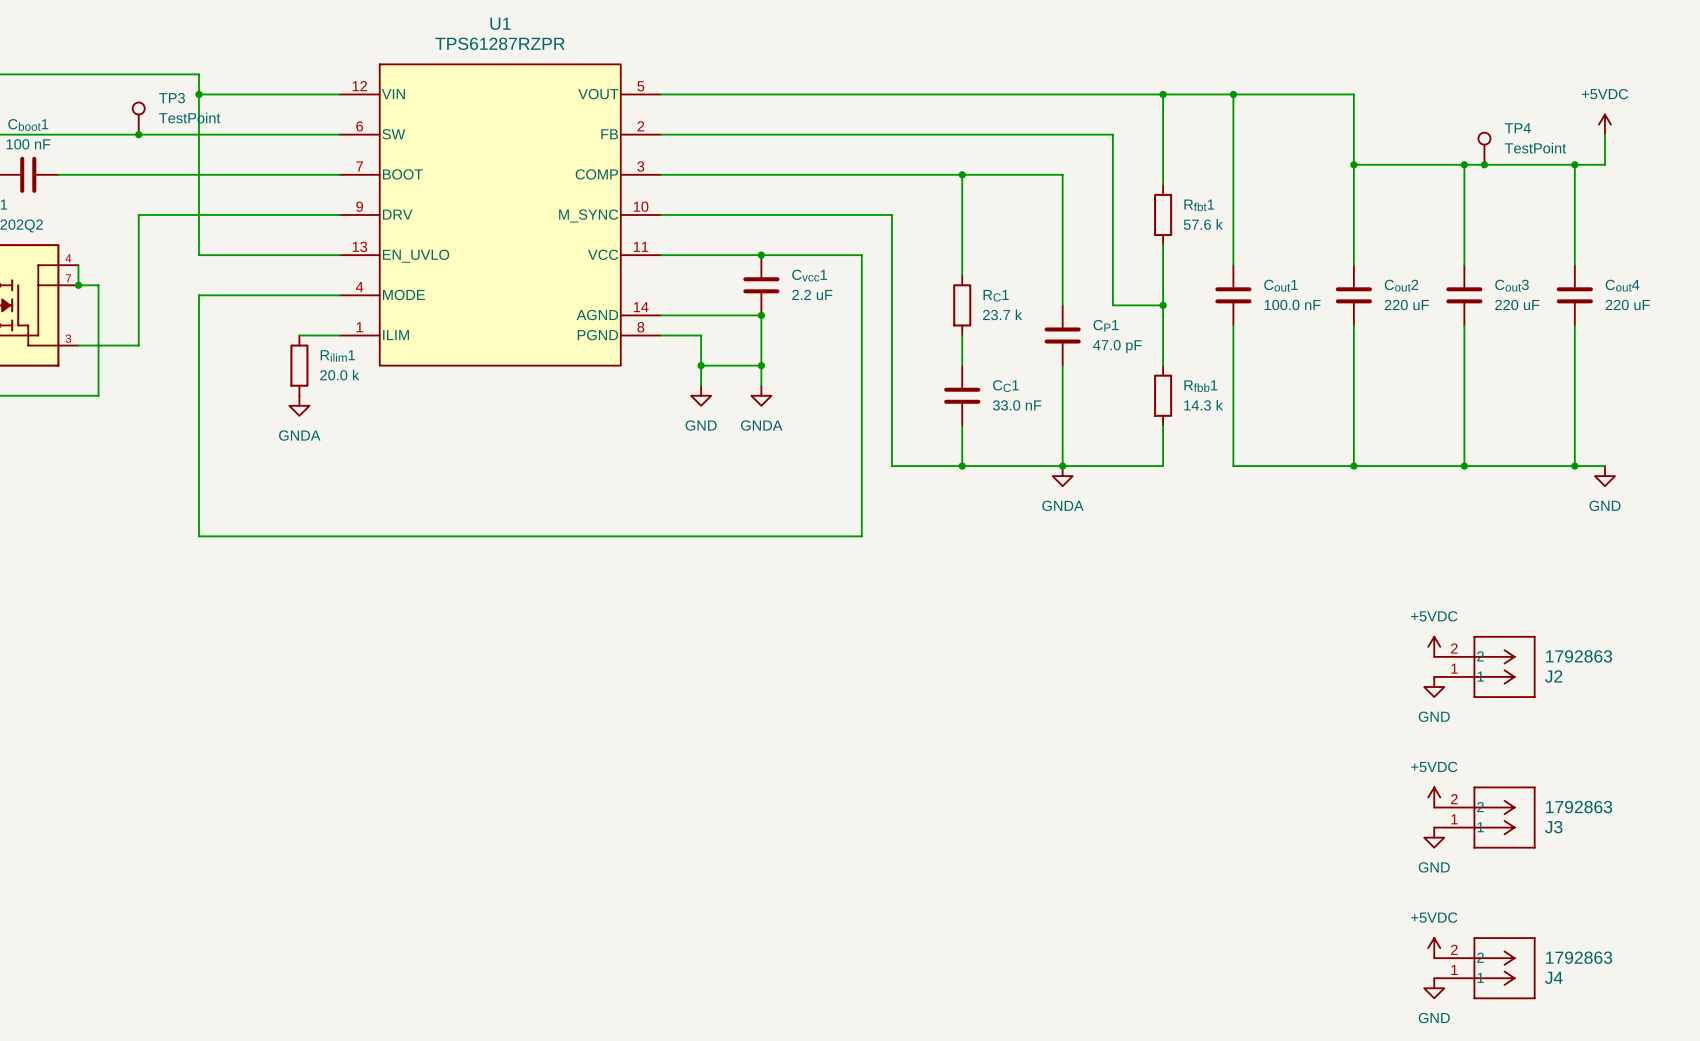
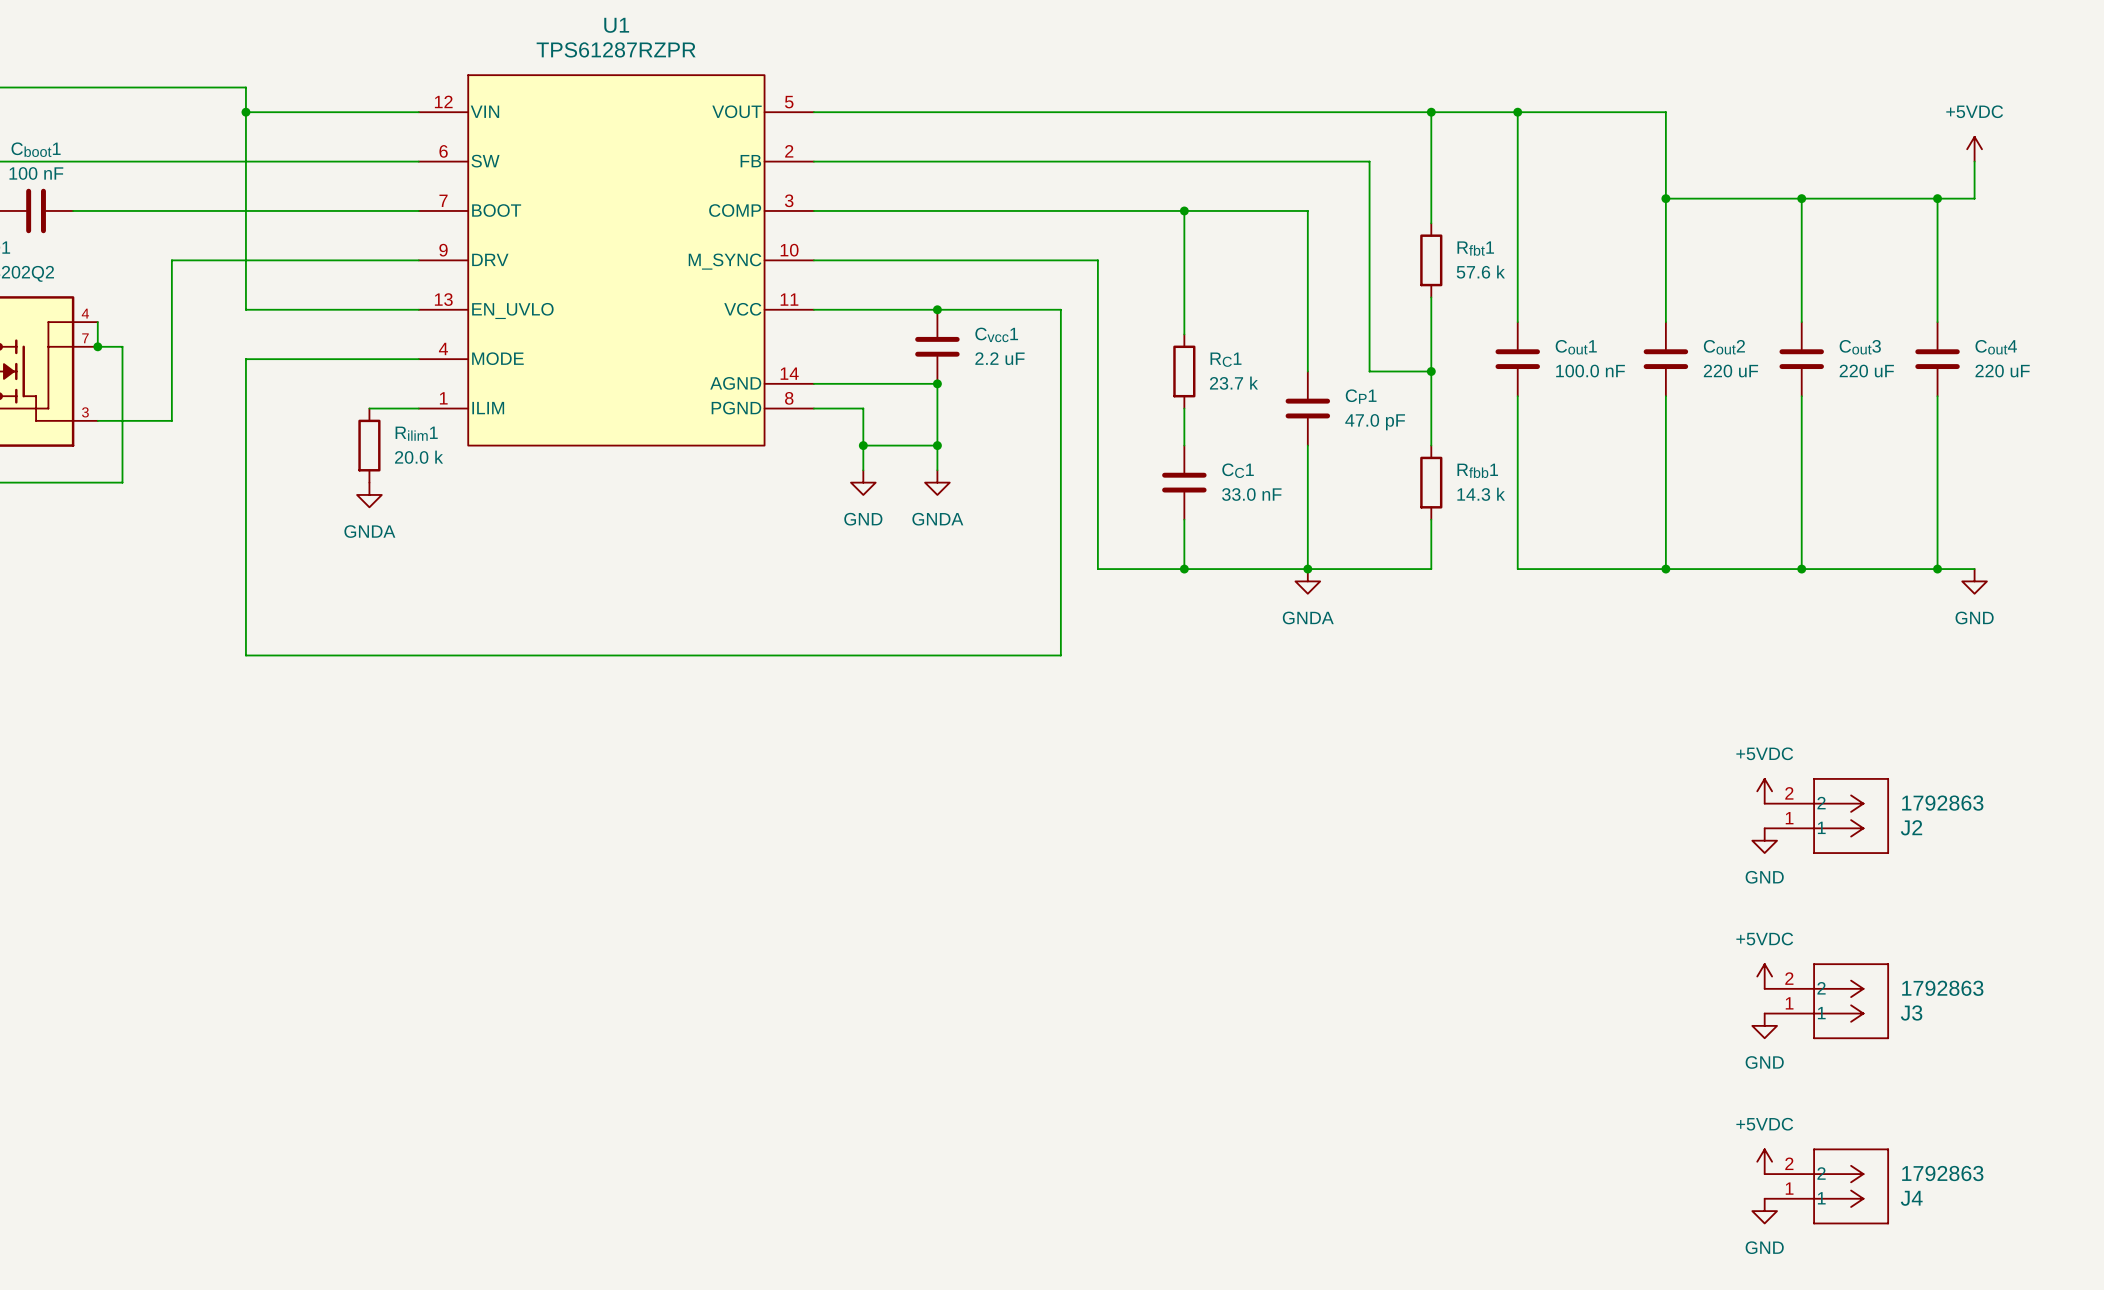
TP3: TestPoint (138, 118) -> none
junction: (138, 134) -> none
TP4: TestPoint (1484, 148) -> none
junction: (1484, 164) -> none

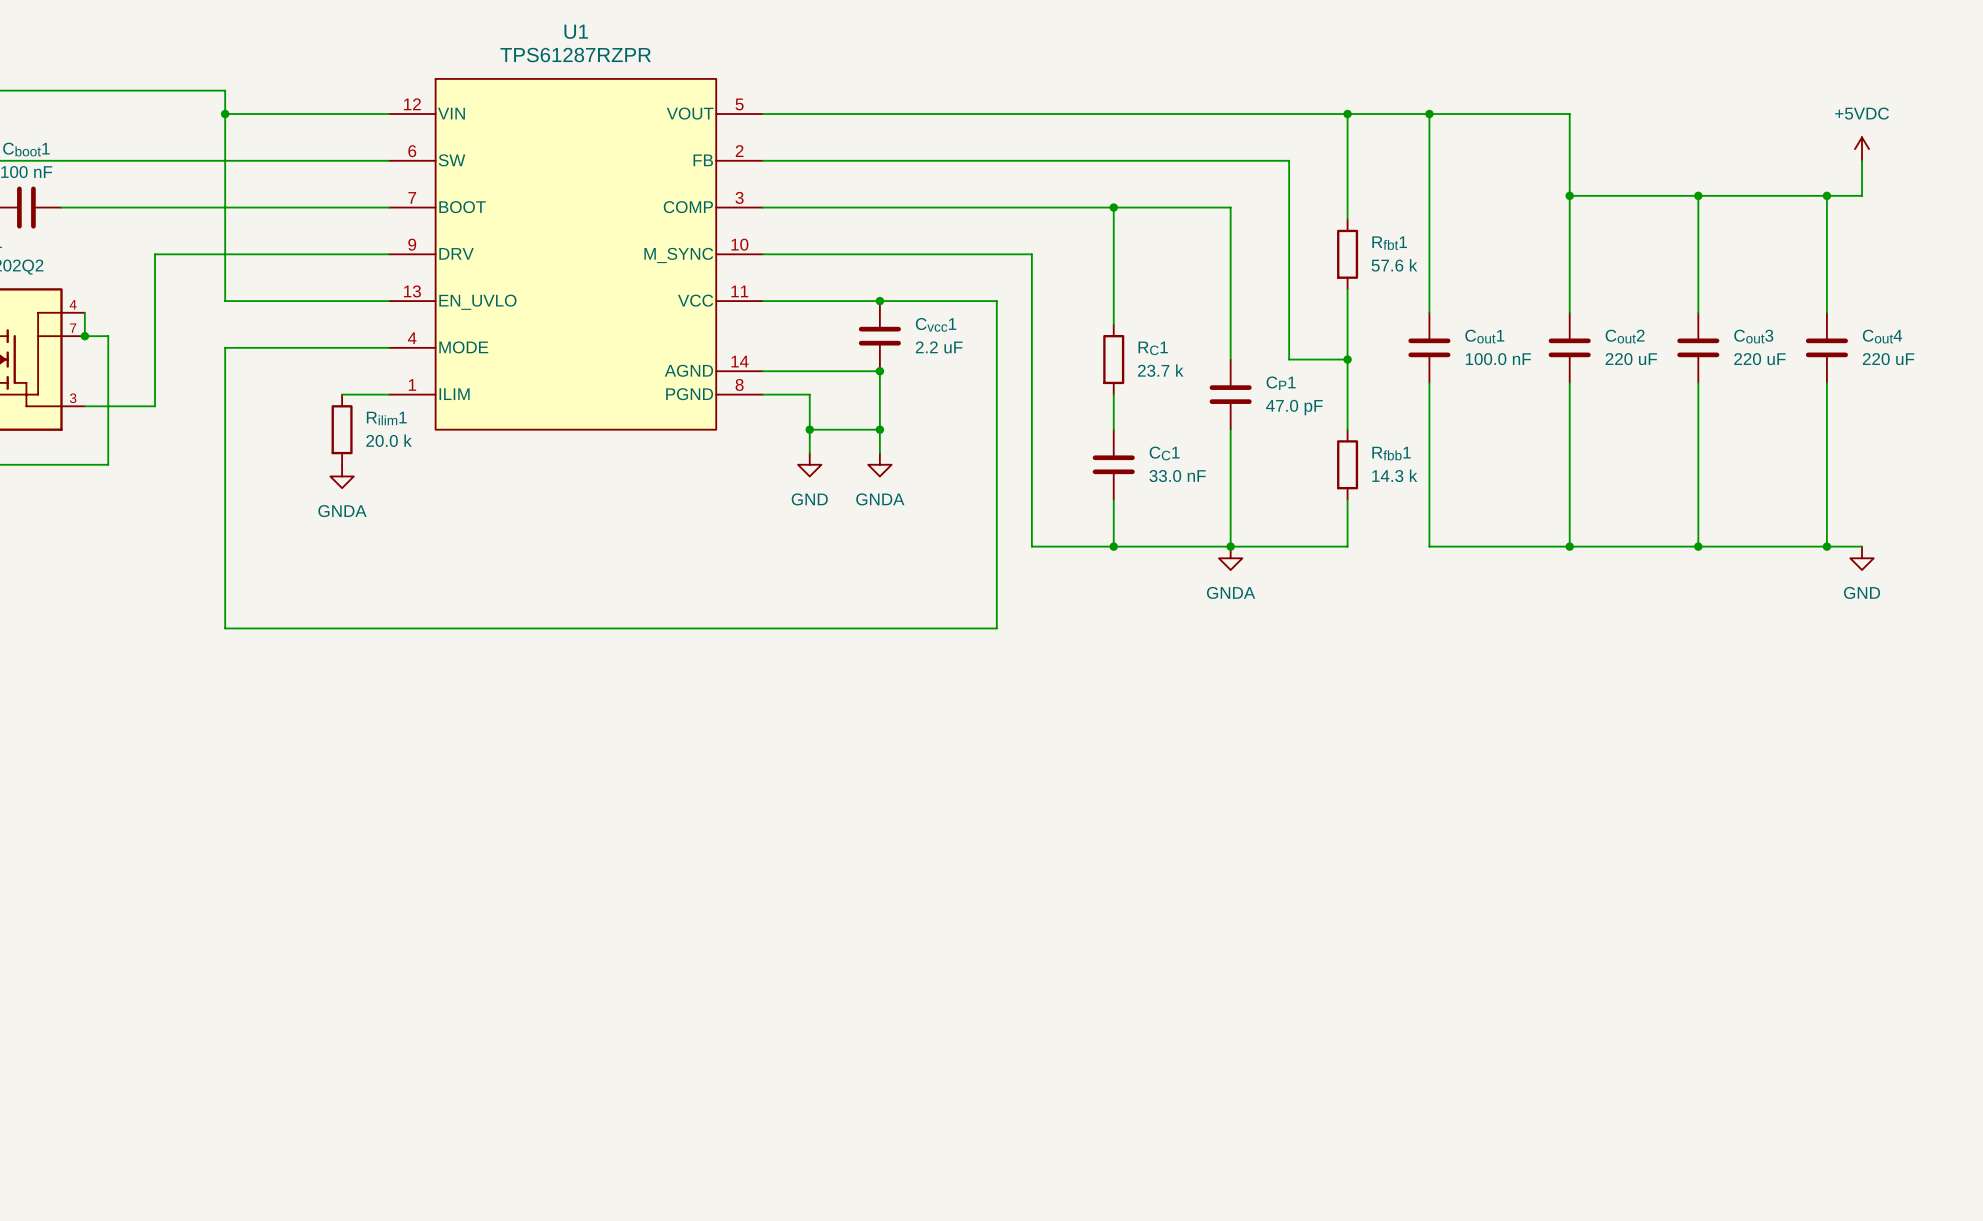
power symbol: +5VDC (1764, 791) -> none
J2: 1792863 (1826, 816) -> none
power symbol: GND (1764, 840) -> none
power symbol: +5VDC (1764, 976) -> none
J3: 1792863 (1826, 1001) -> none
power symbol: GND (1764, 1025) -> none
power symbol: +5VDC (1764, 1161) -> none
J4: 1792863 (1826, 1186) -> none
power symbol: GND (1764, 1211) -> none

